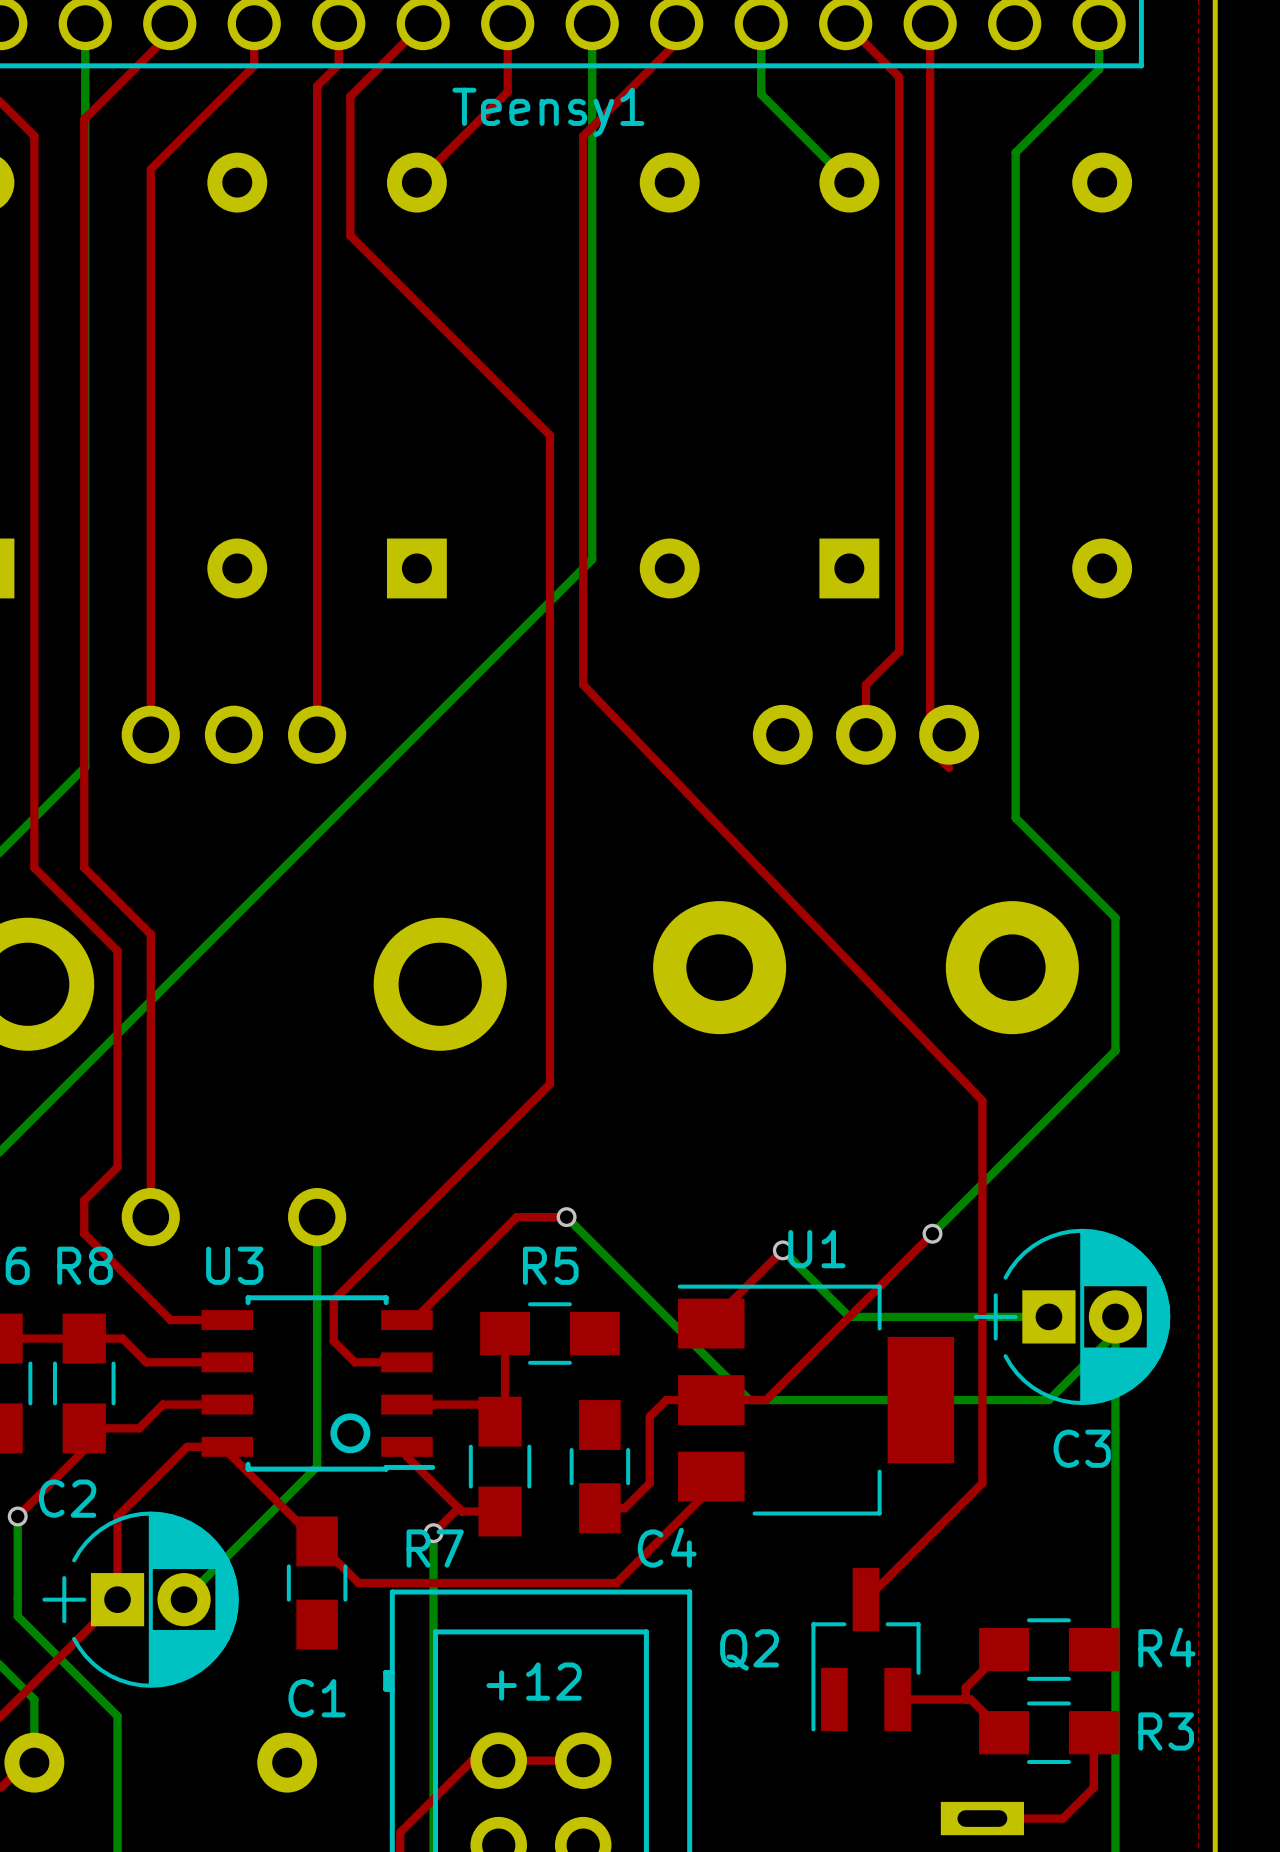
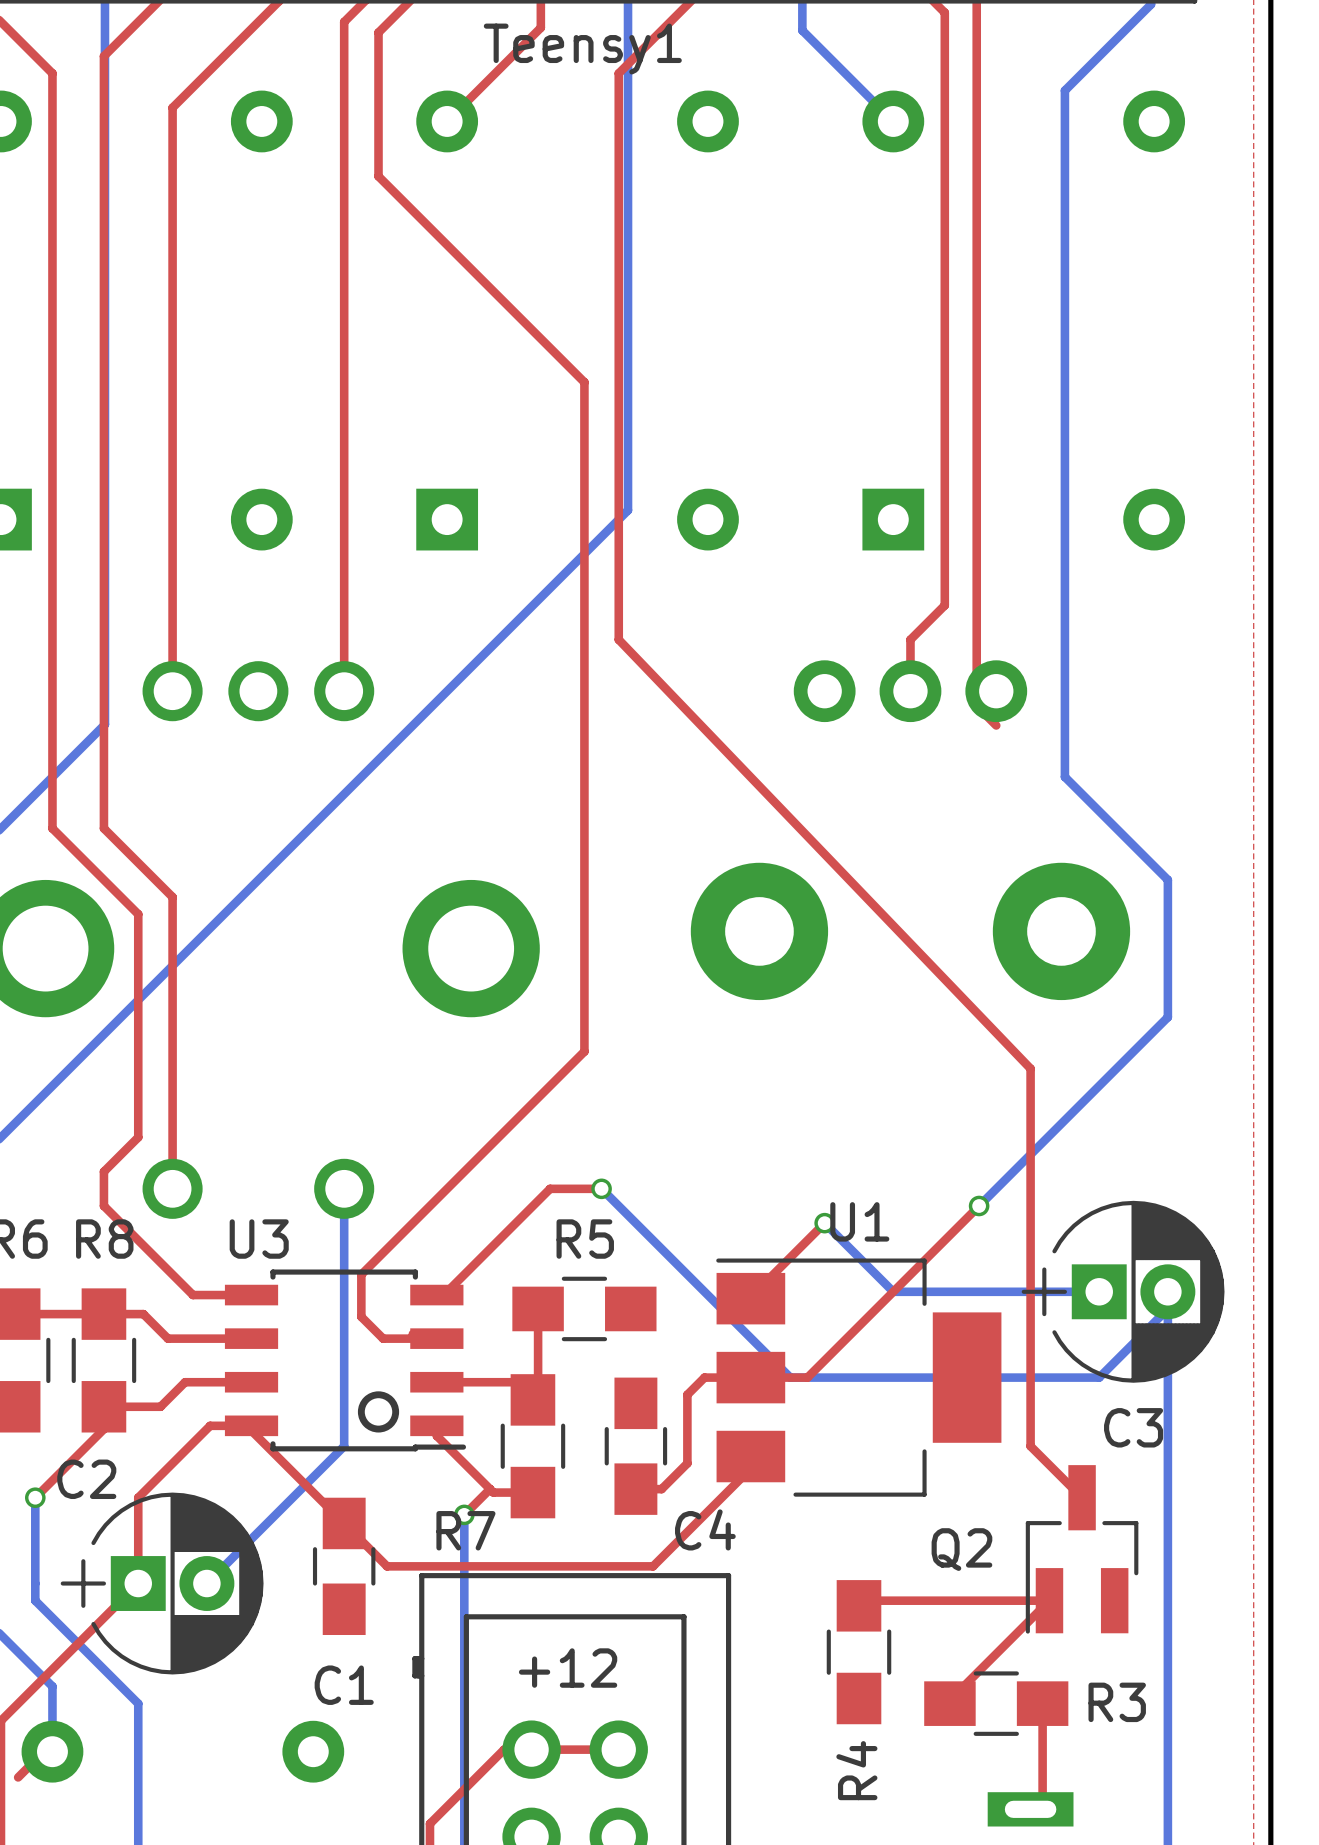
top track: (982, 1466) (982, 1483) (865, 1599) -> (1030, 1446) (1082, 1497)
top track: none -> (864, 1600) (1049, 1600) (949, 1700) (949, 1703)
Q2 position: (865, 1649) -> (1082, 1549)
top track: (1004, 1649) (965, 1687) (965, 1699) -> none
R4 rotation: 0° (1048, 1649) -> 90° clockwise (858, 1652)
R4 position: (1048, 1649) -> (858, 1652)
top track: (897, 1699) (970, 1699) (1004, 1732) -> none
R3 position: (1048, 1732) -> (996, 1703)
top track: (1093, 1732) (1093, 1787) (1062, 1818) (982, 1818) -> (1042, 1703) (1042, 1797) (1030, 1809)

